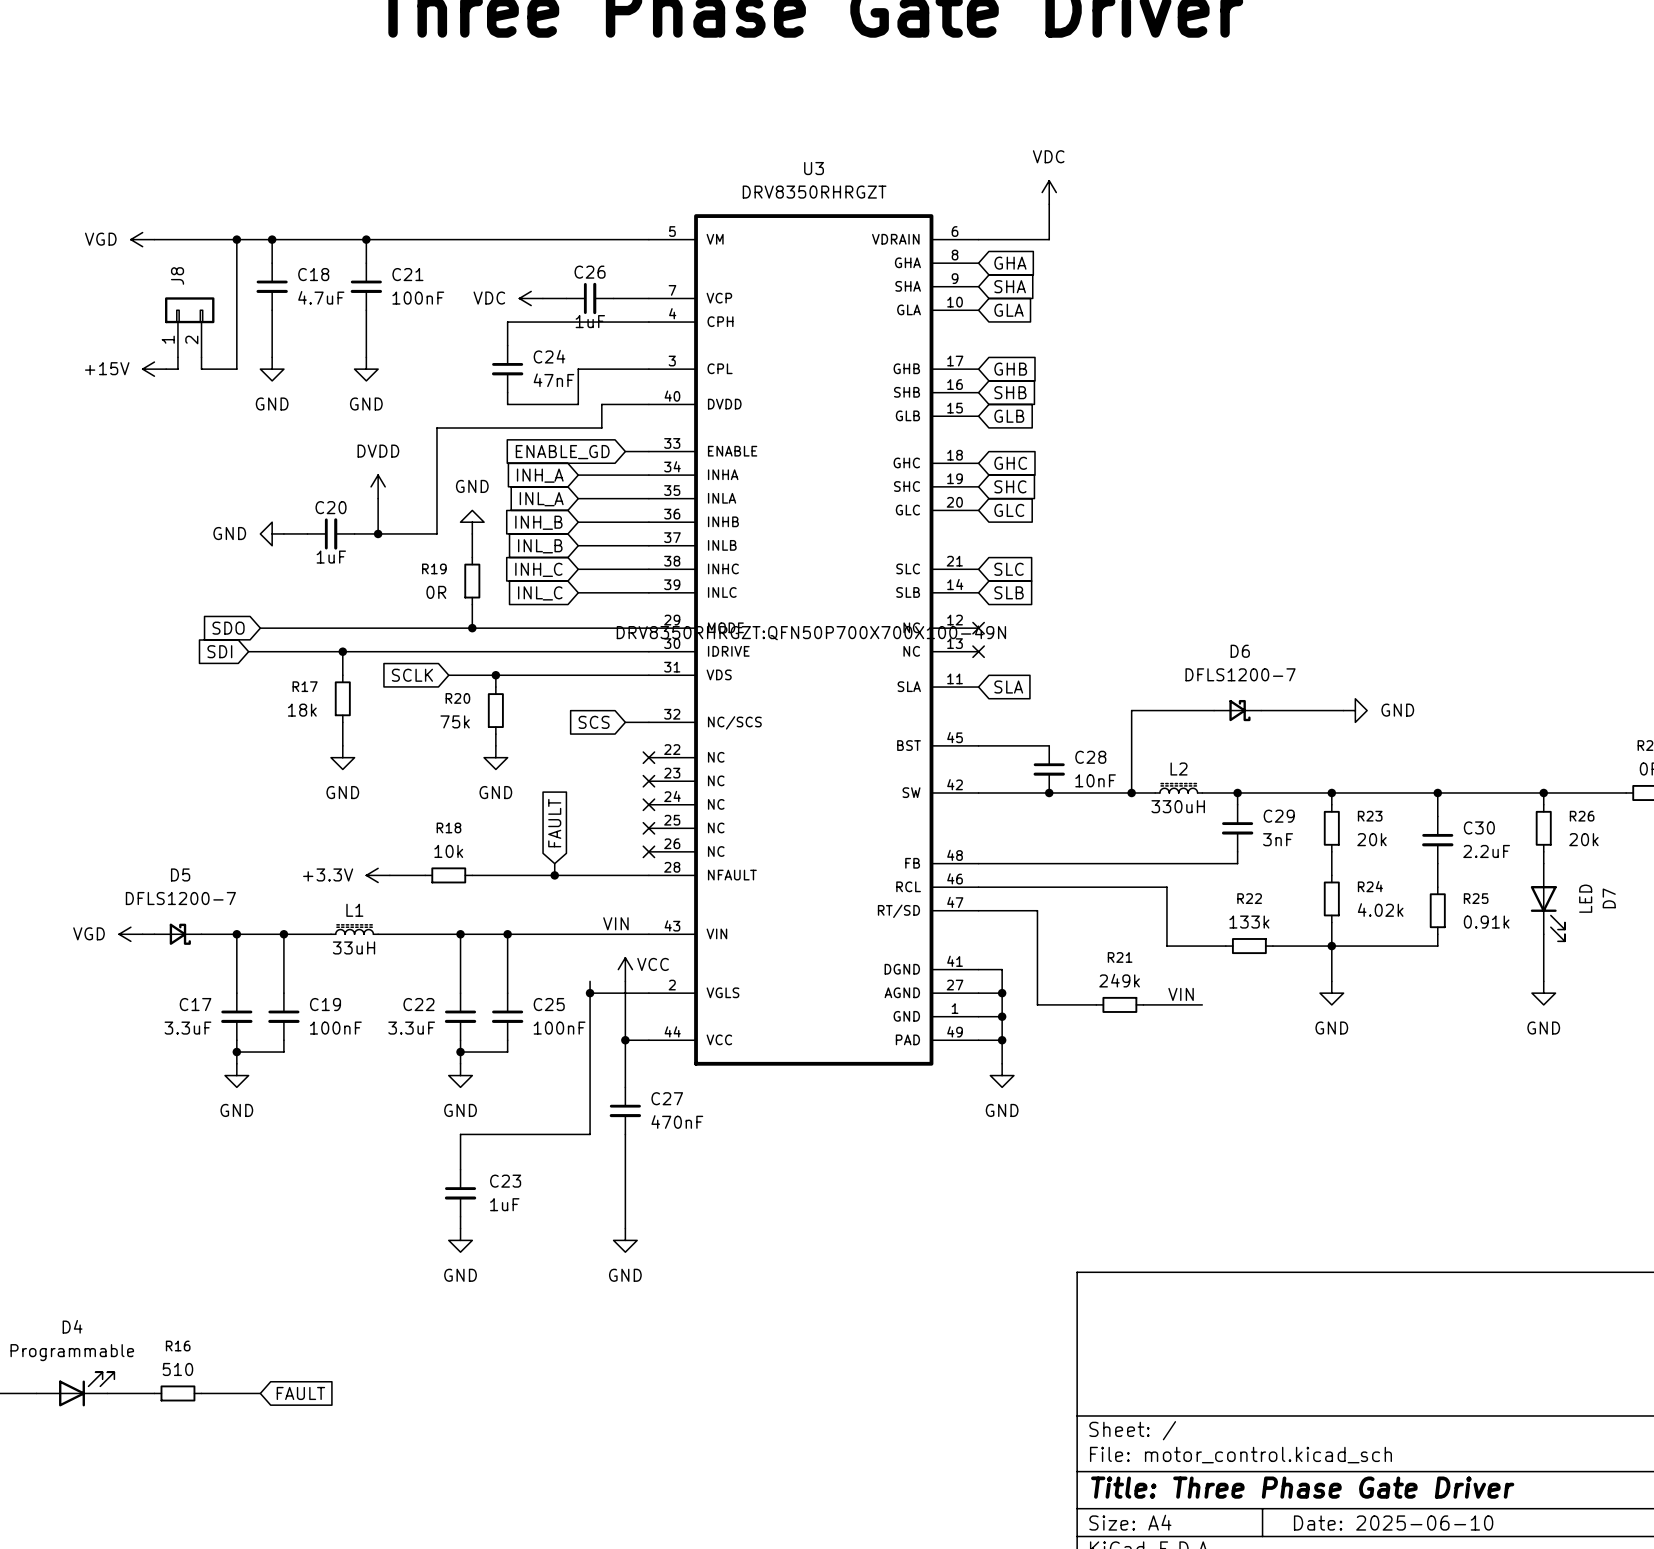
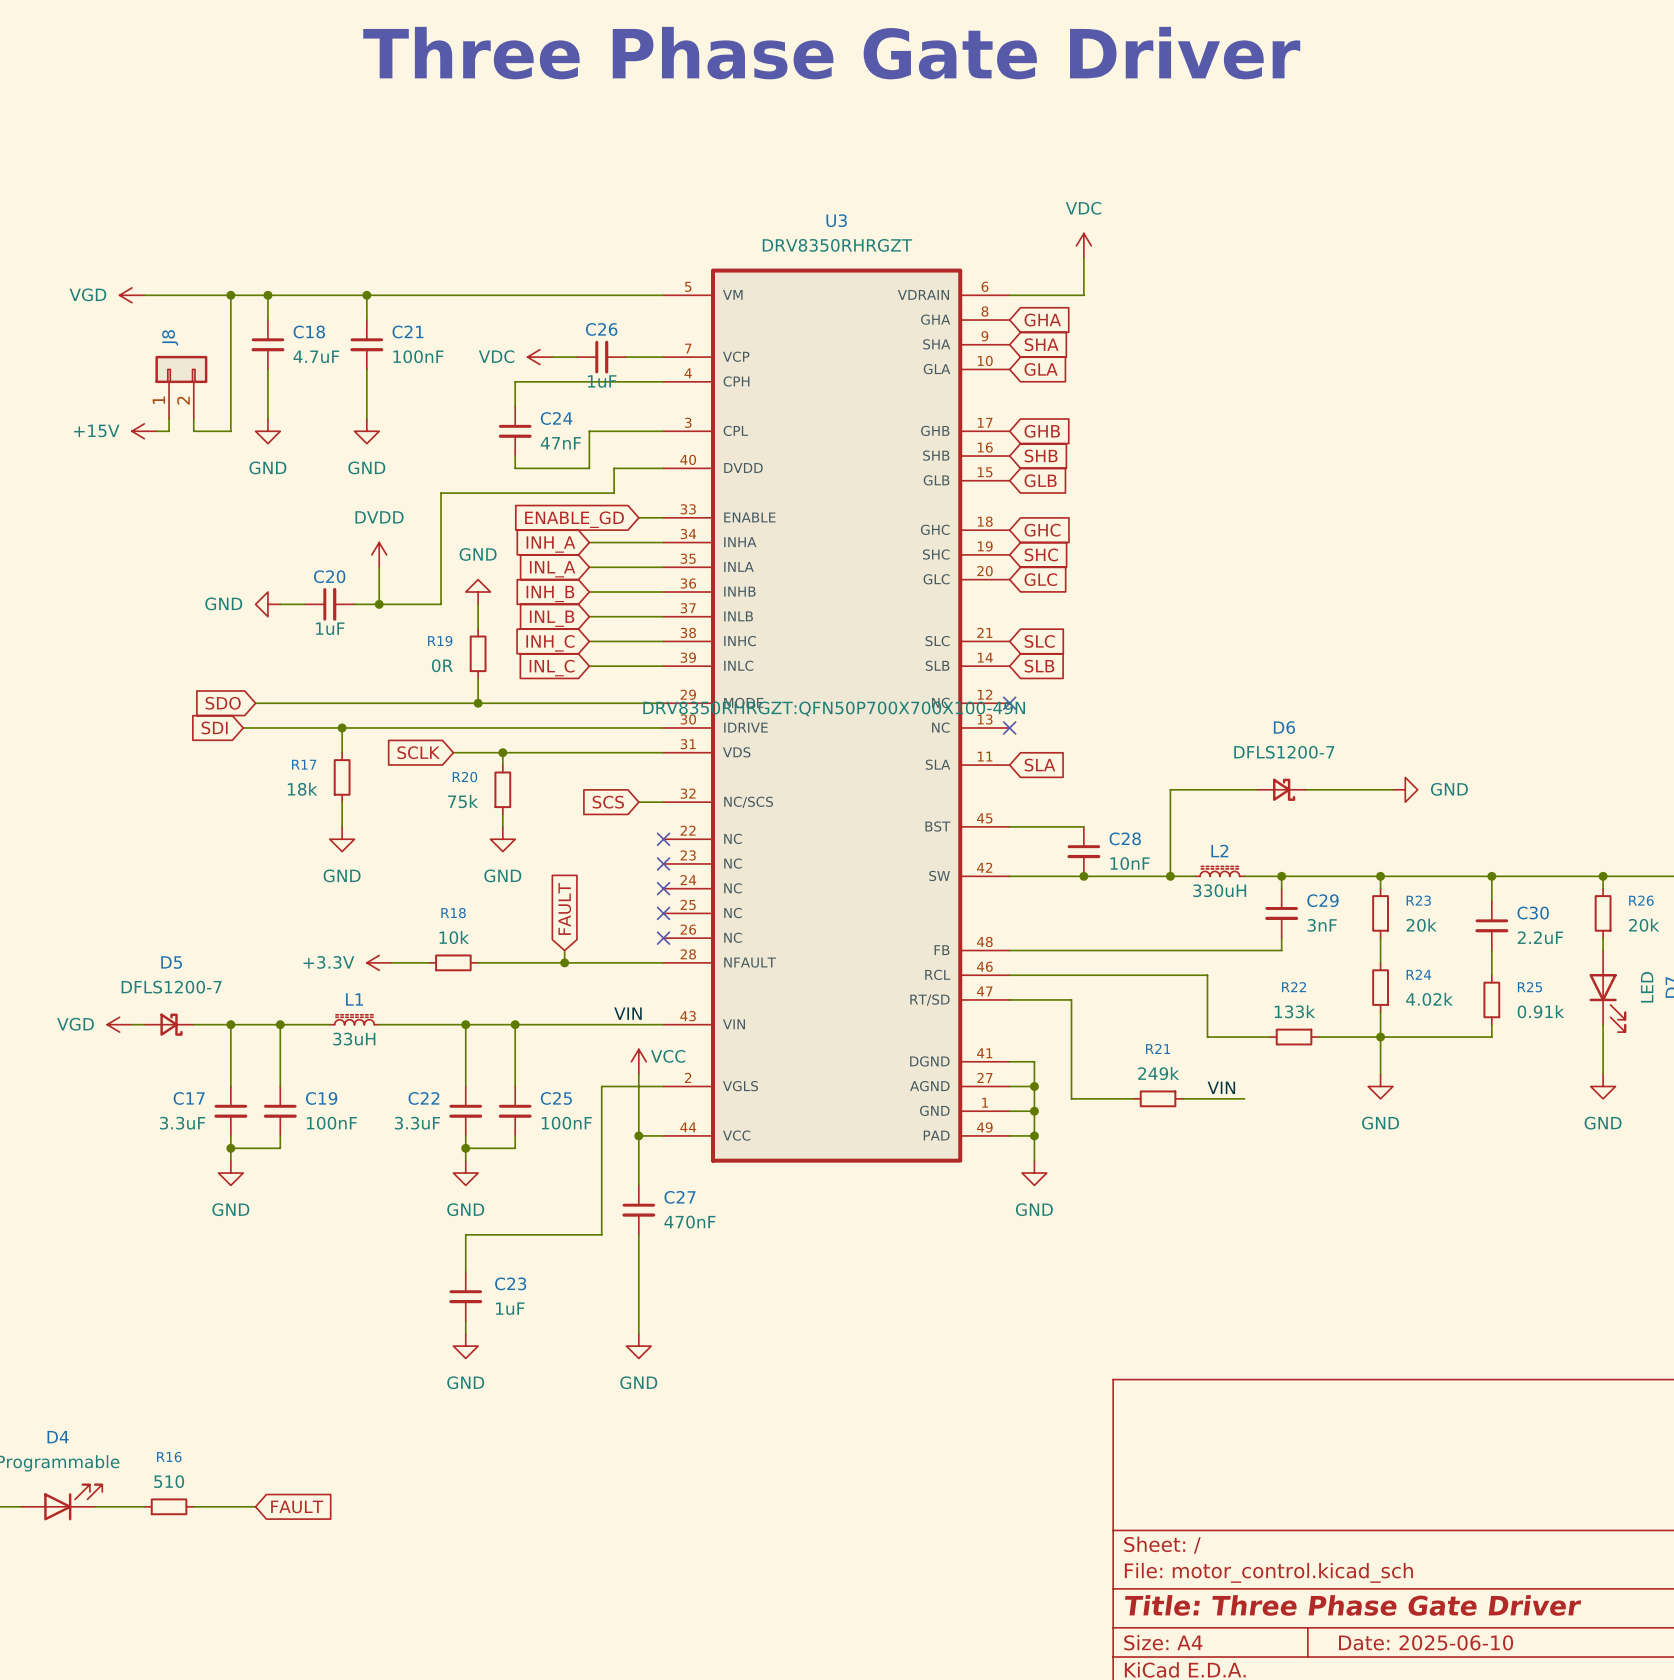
wire: (590, 981) (590, 993) -> none
junction: (590, 993) -> none

